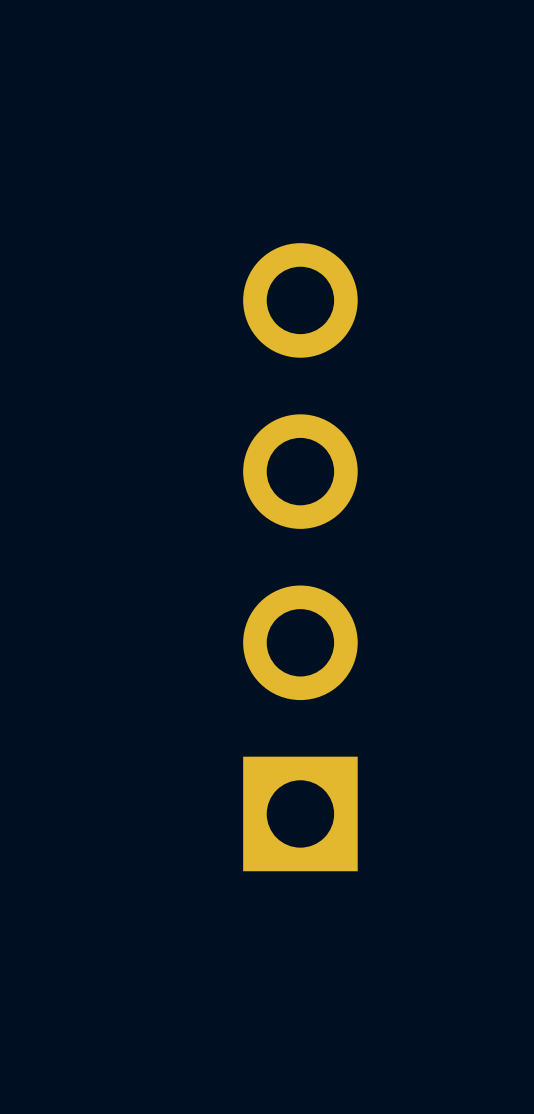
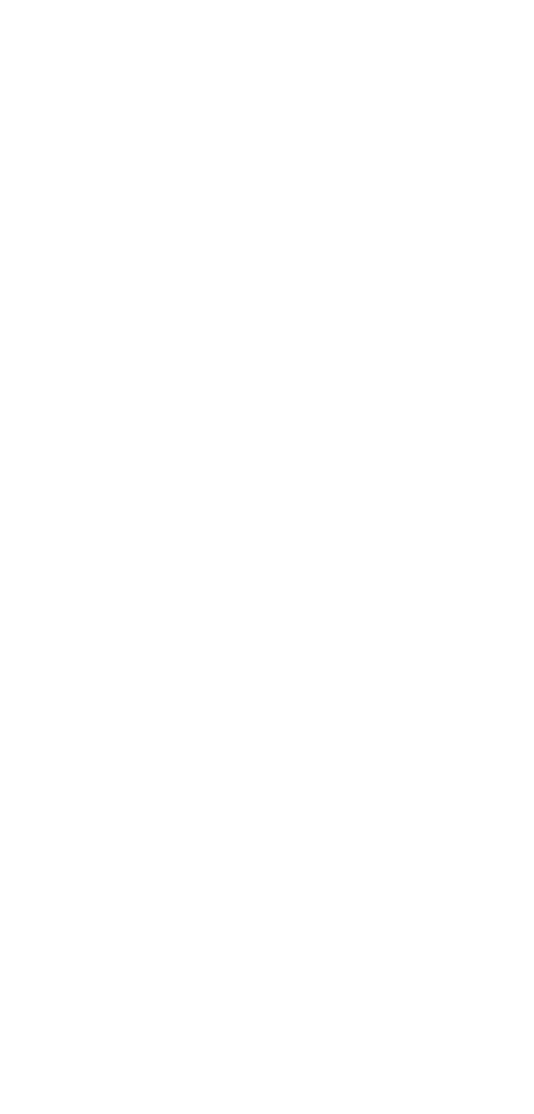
part: (300, 557) -> none

